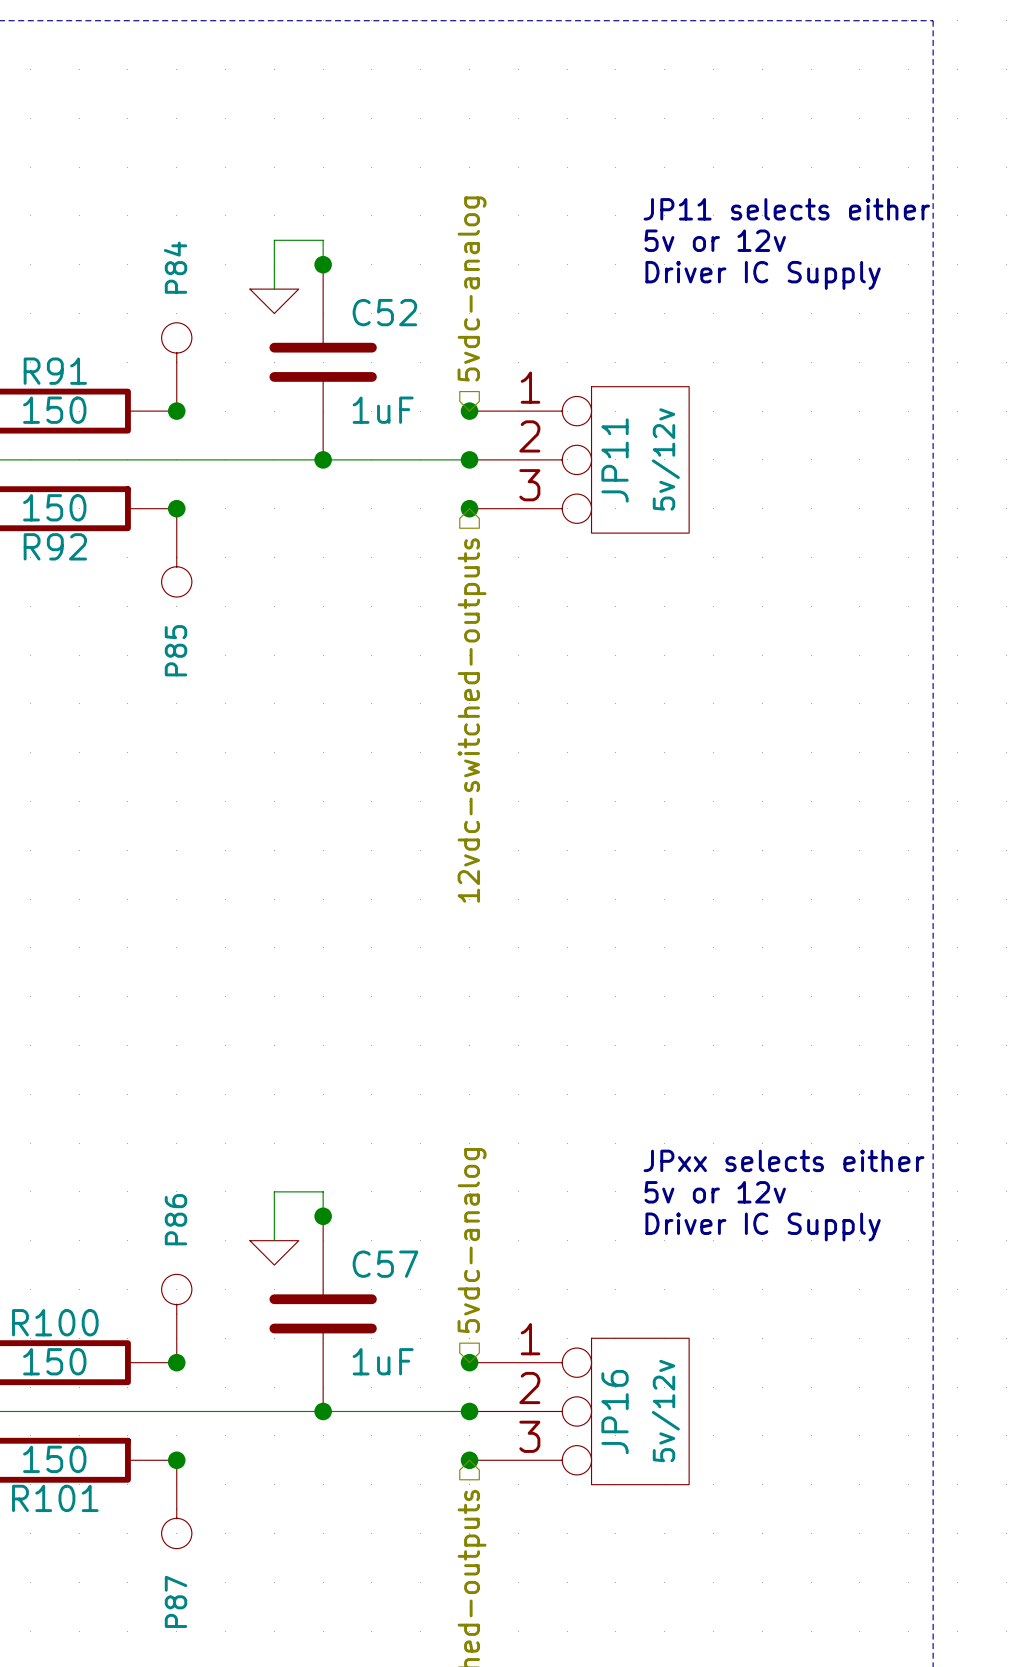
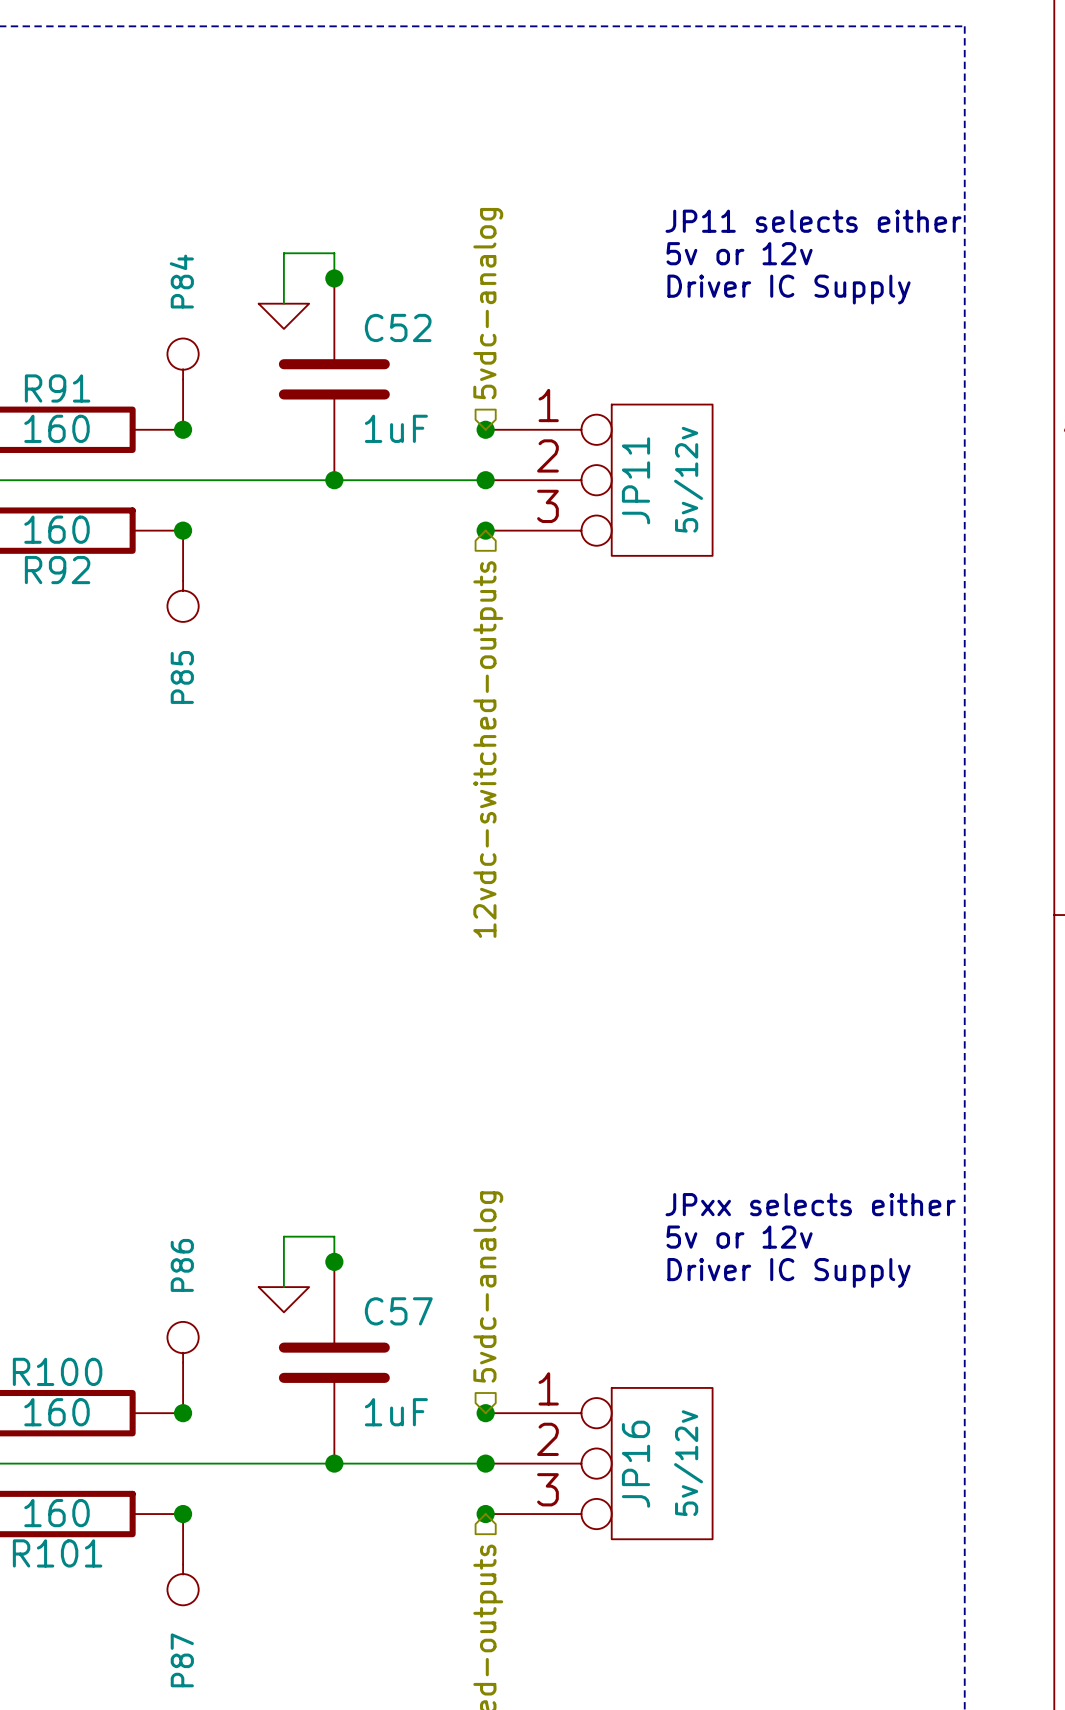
R91 value: 150 (54, 410) -> 160 (56, 428)
R92 value: 150 (54, 507) -> 160 (56, 529)
R100 value: 150 (54, 1361) -> 160 (56, 1412)
R101 value: 150 (54, 1459) -> 160 (56, 1513)

